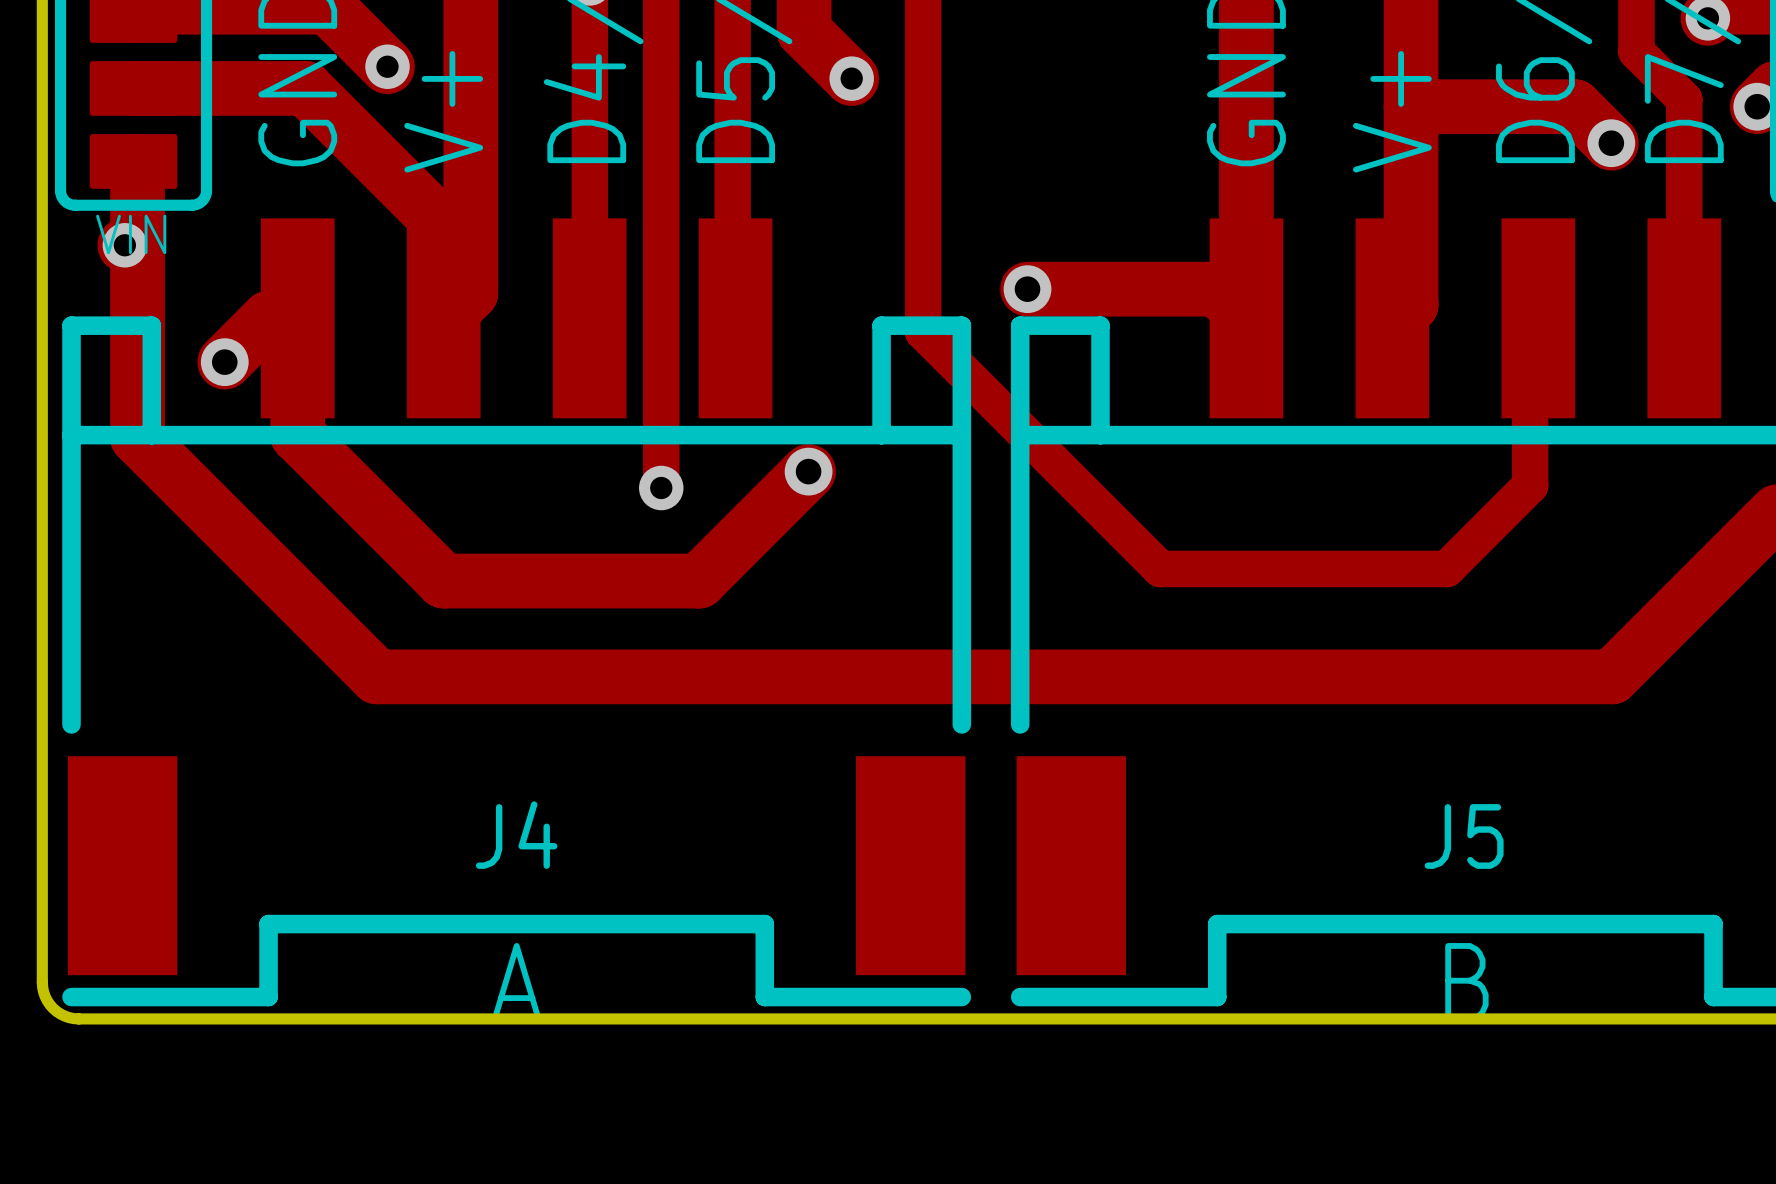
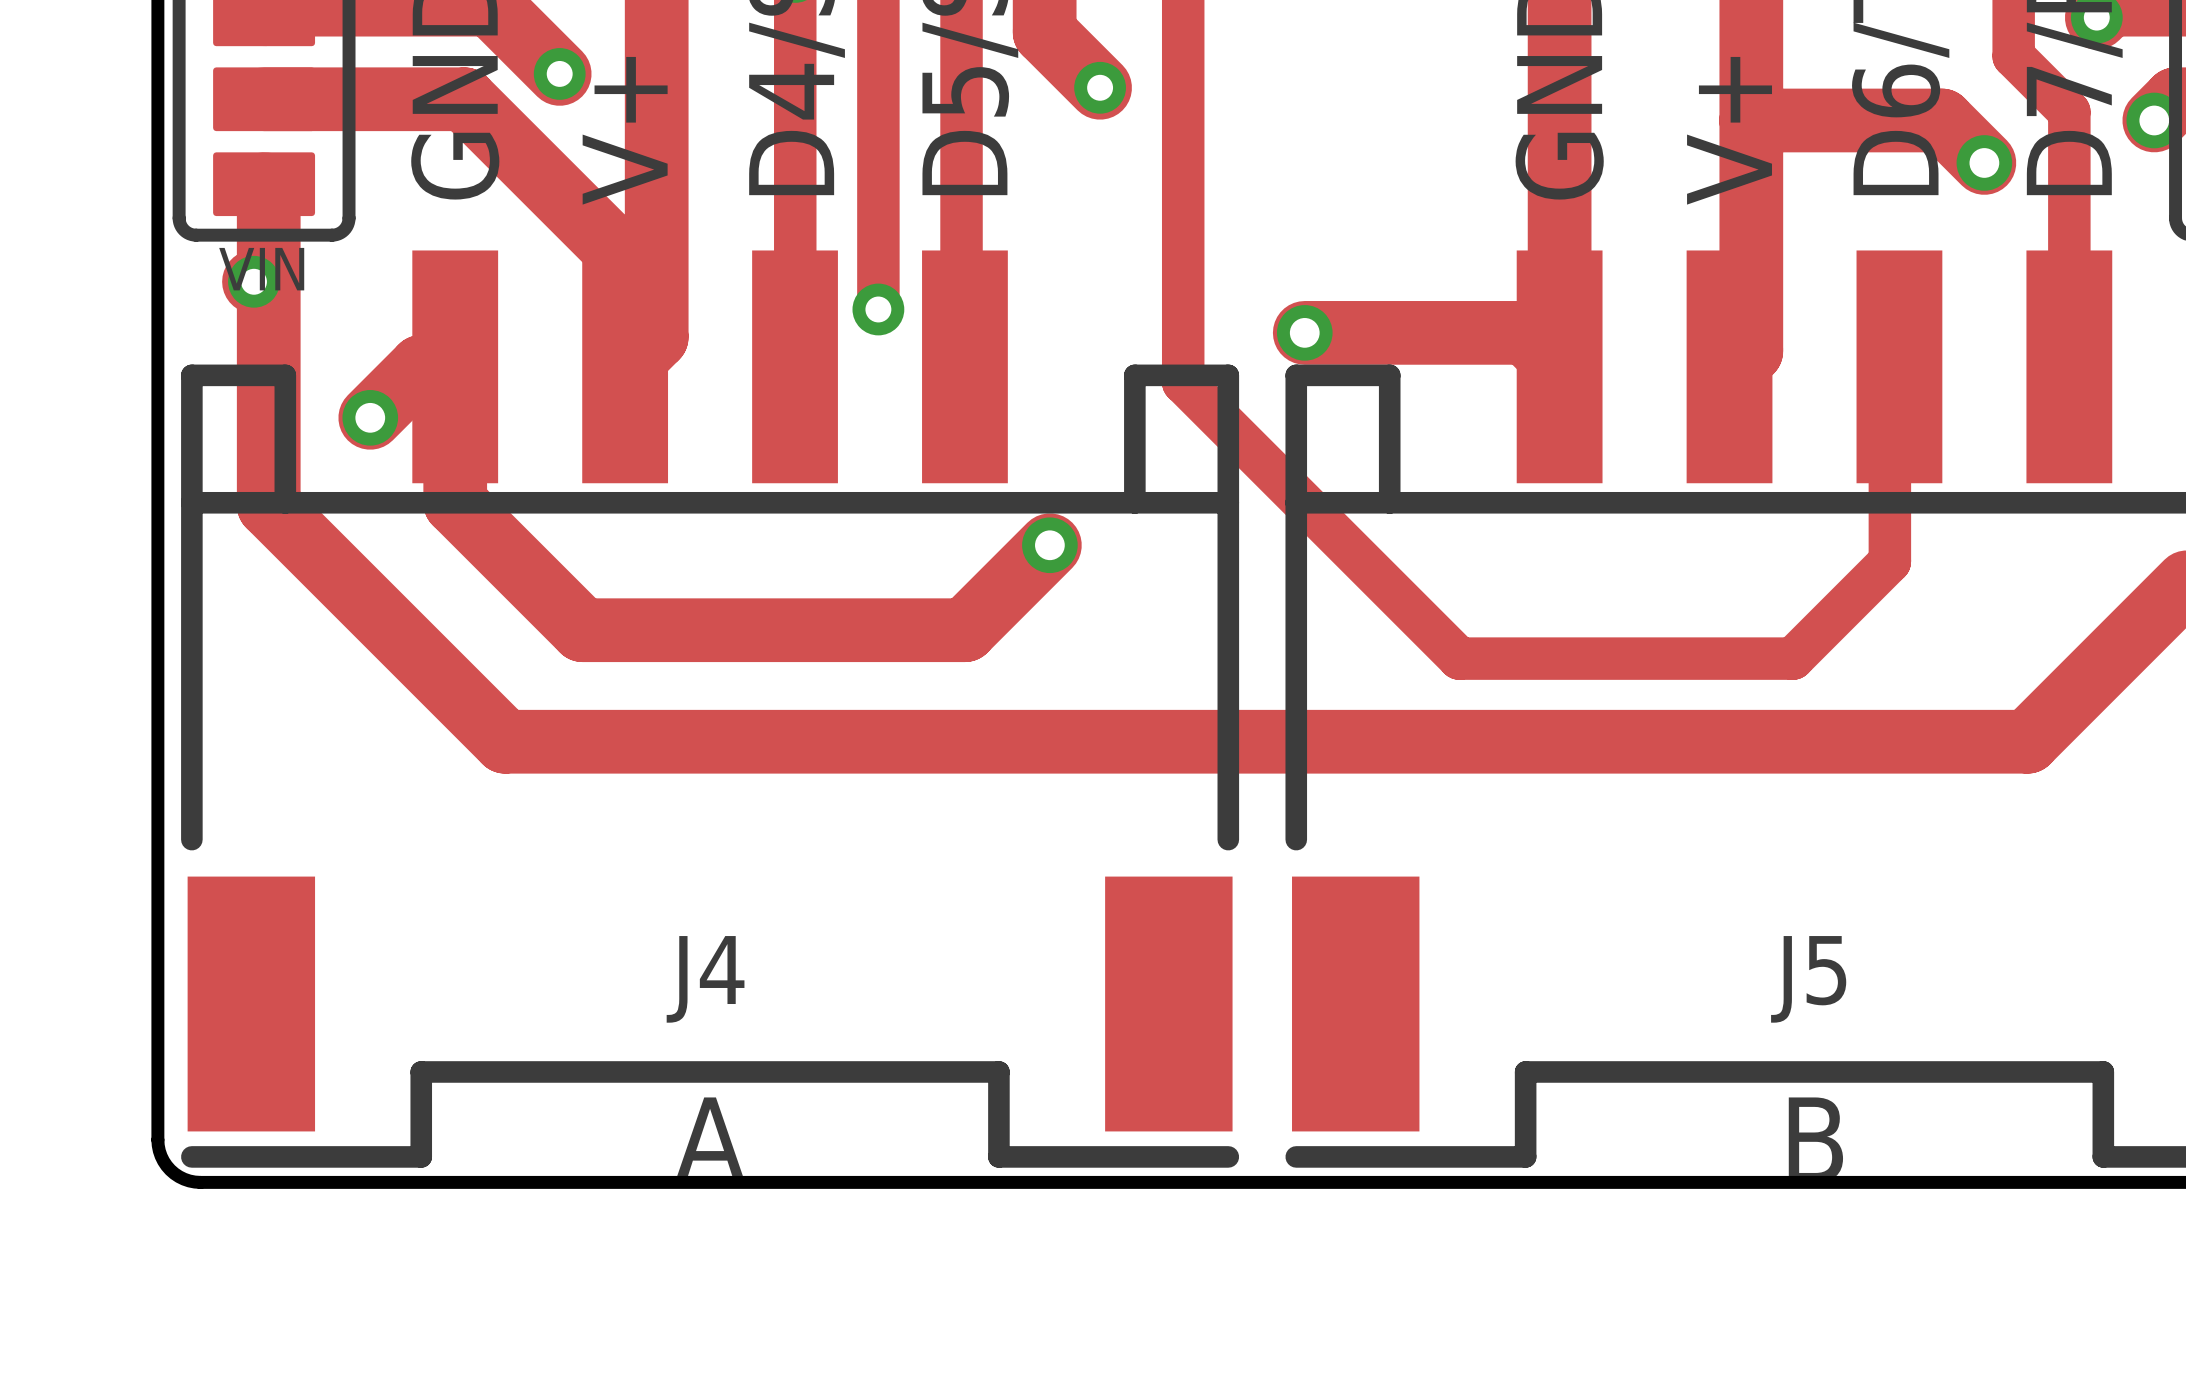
track: (661, 269) (661, 488) -> none
via position: (661, 488) -> (878, 309)
track: (407, 544) (443, 581) (699, 581) (735, 544) -> (582, 630) (964, 630)
track: (340, 640) (377, 676) (1611, 676) (1648, 640) -> (505, 741) (2027, 741)

